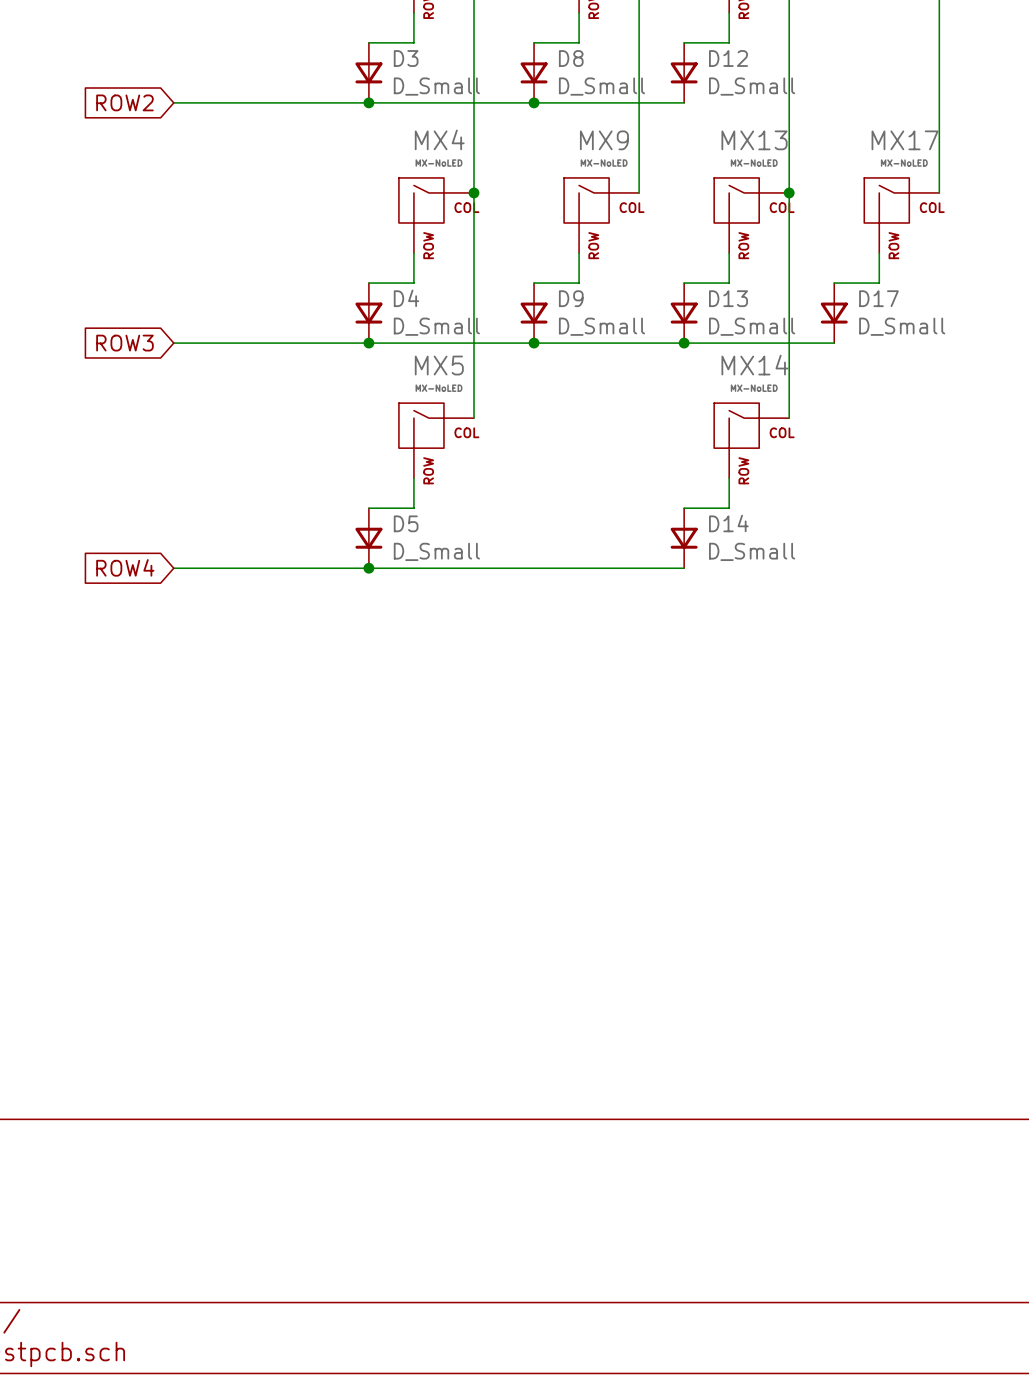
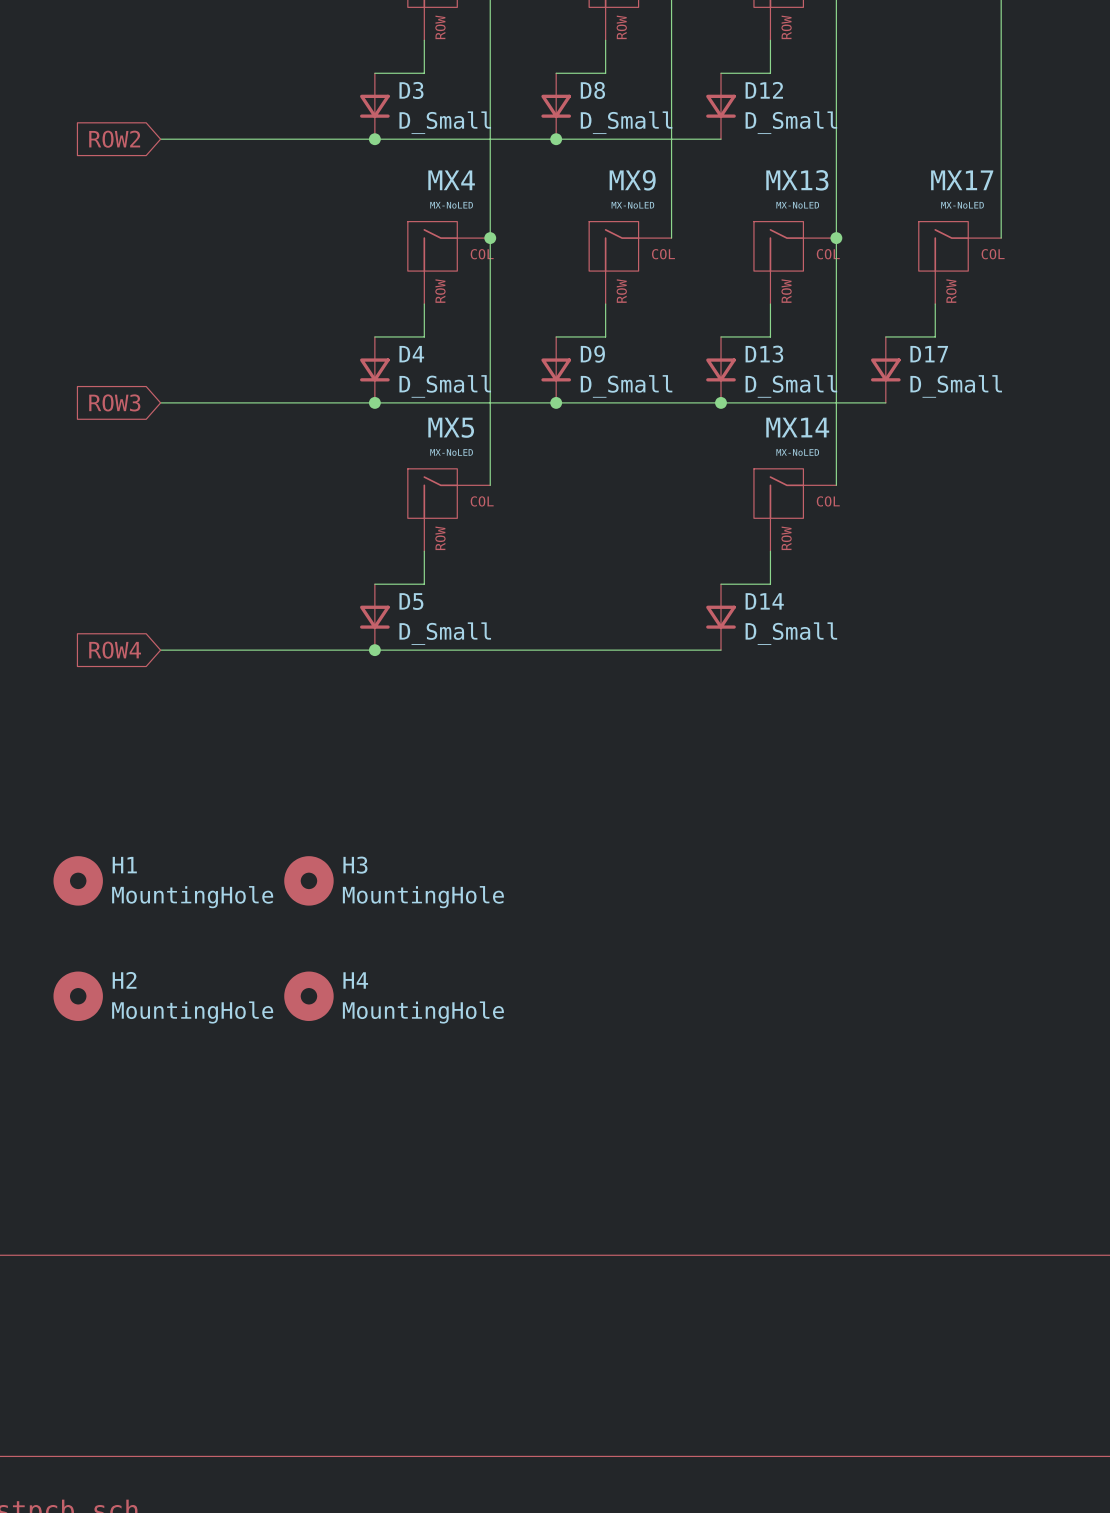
H1: none -> MountingHole (78, 880)
H3: none -> MountingHole (308, 880)
H2: none -> MountingHole (78, 996)
H4: none -> MountingHole (308, 996)

